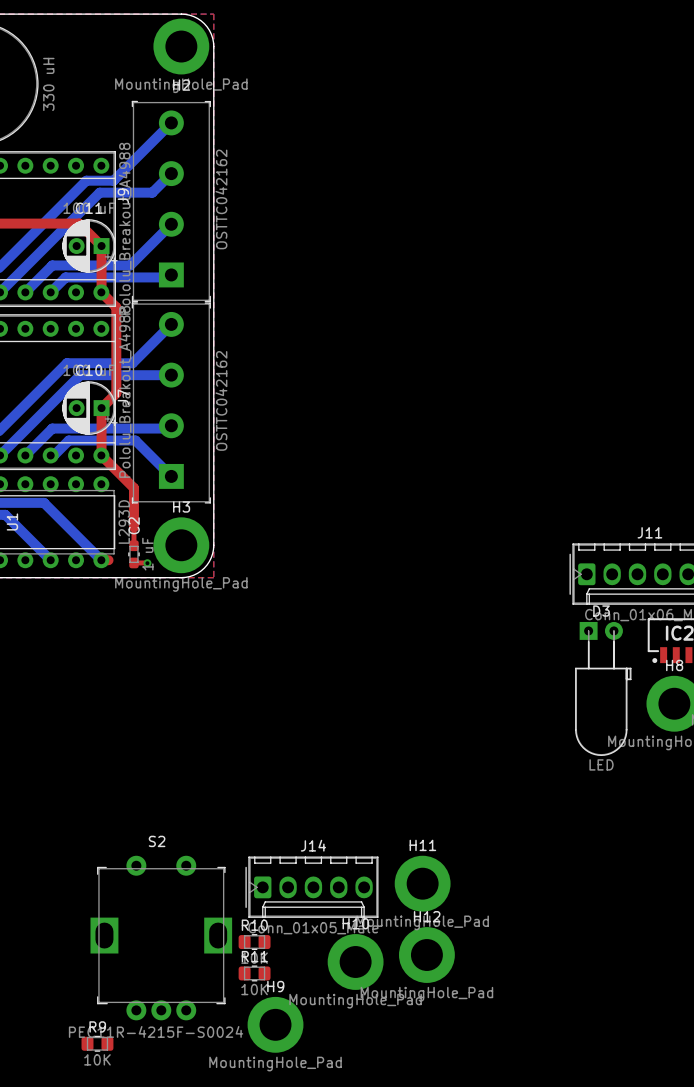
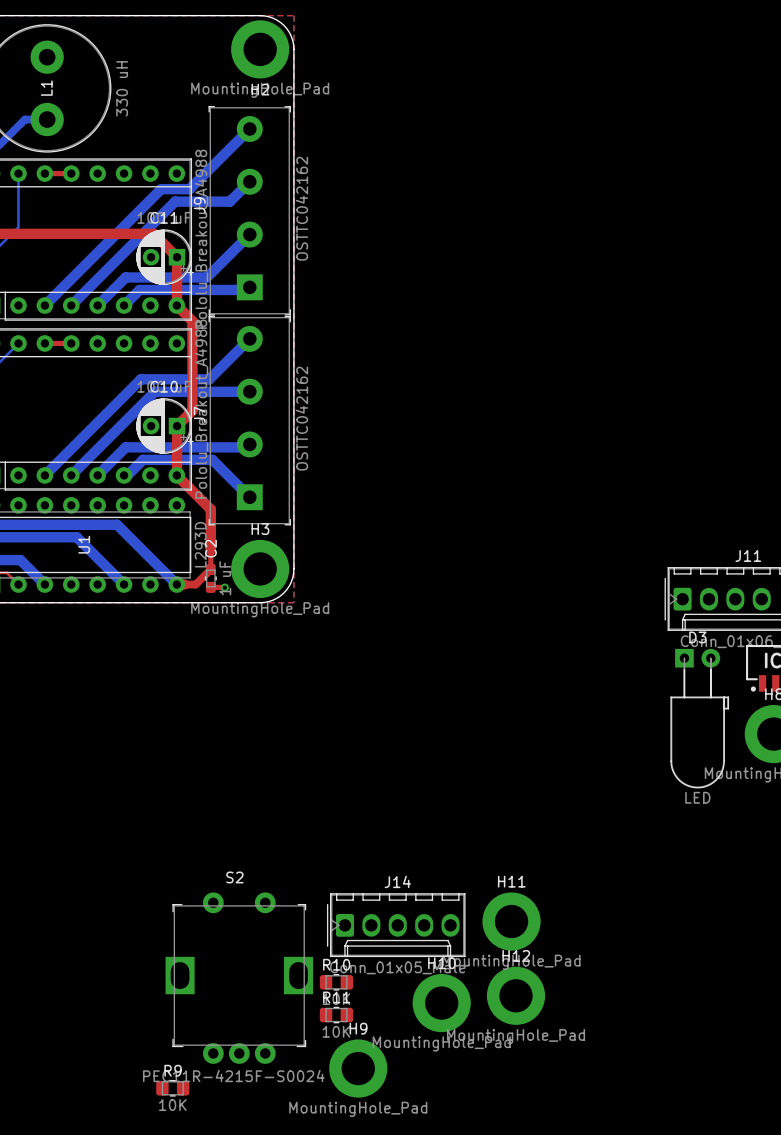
top track: none -> (210, 569) (195, 584) (176, 584)

